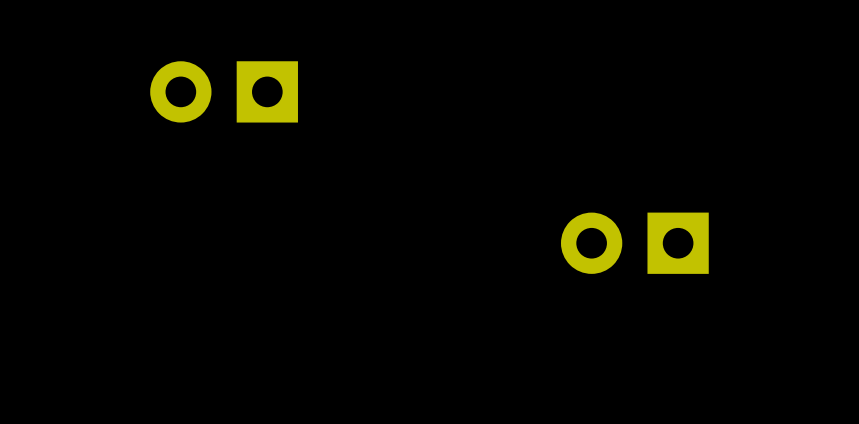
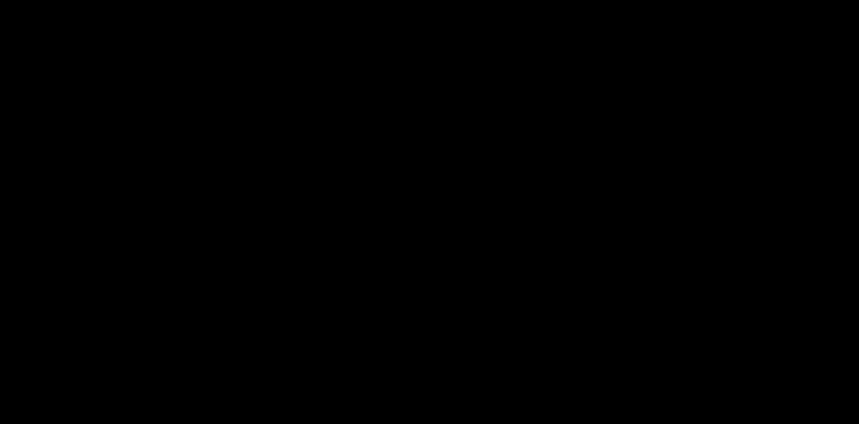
part: (224, 91) -> none
part: (634, 243) -> none

